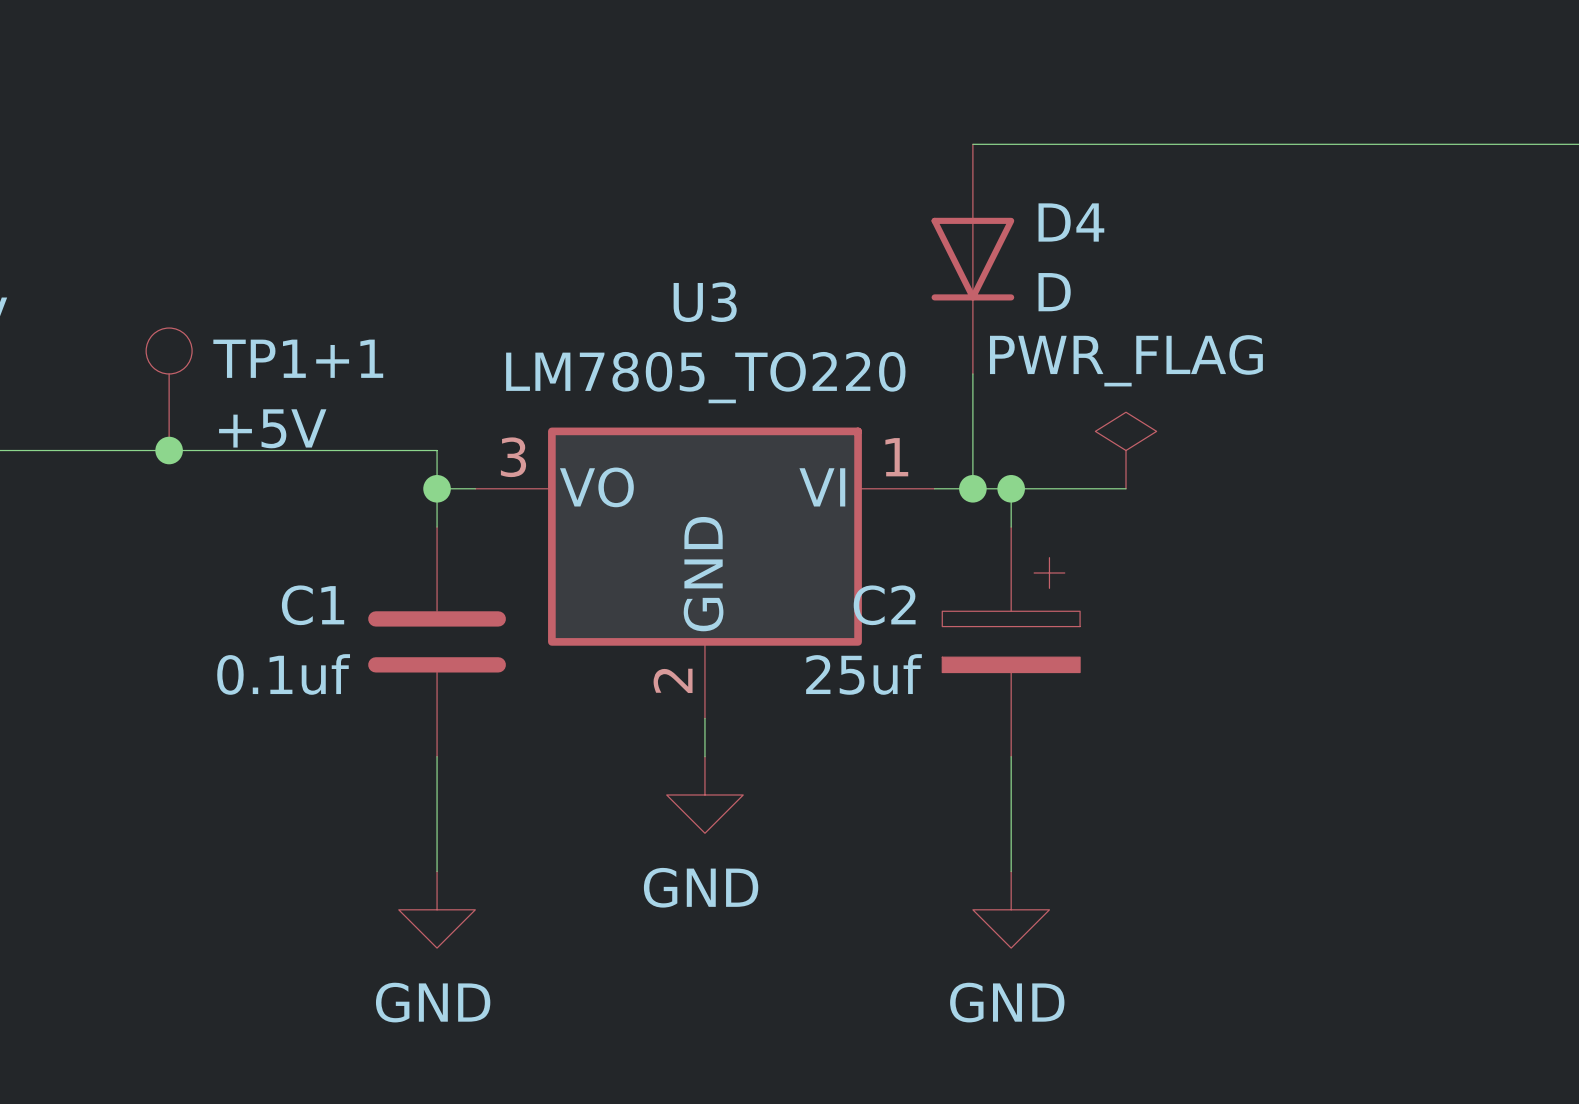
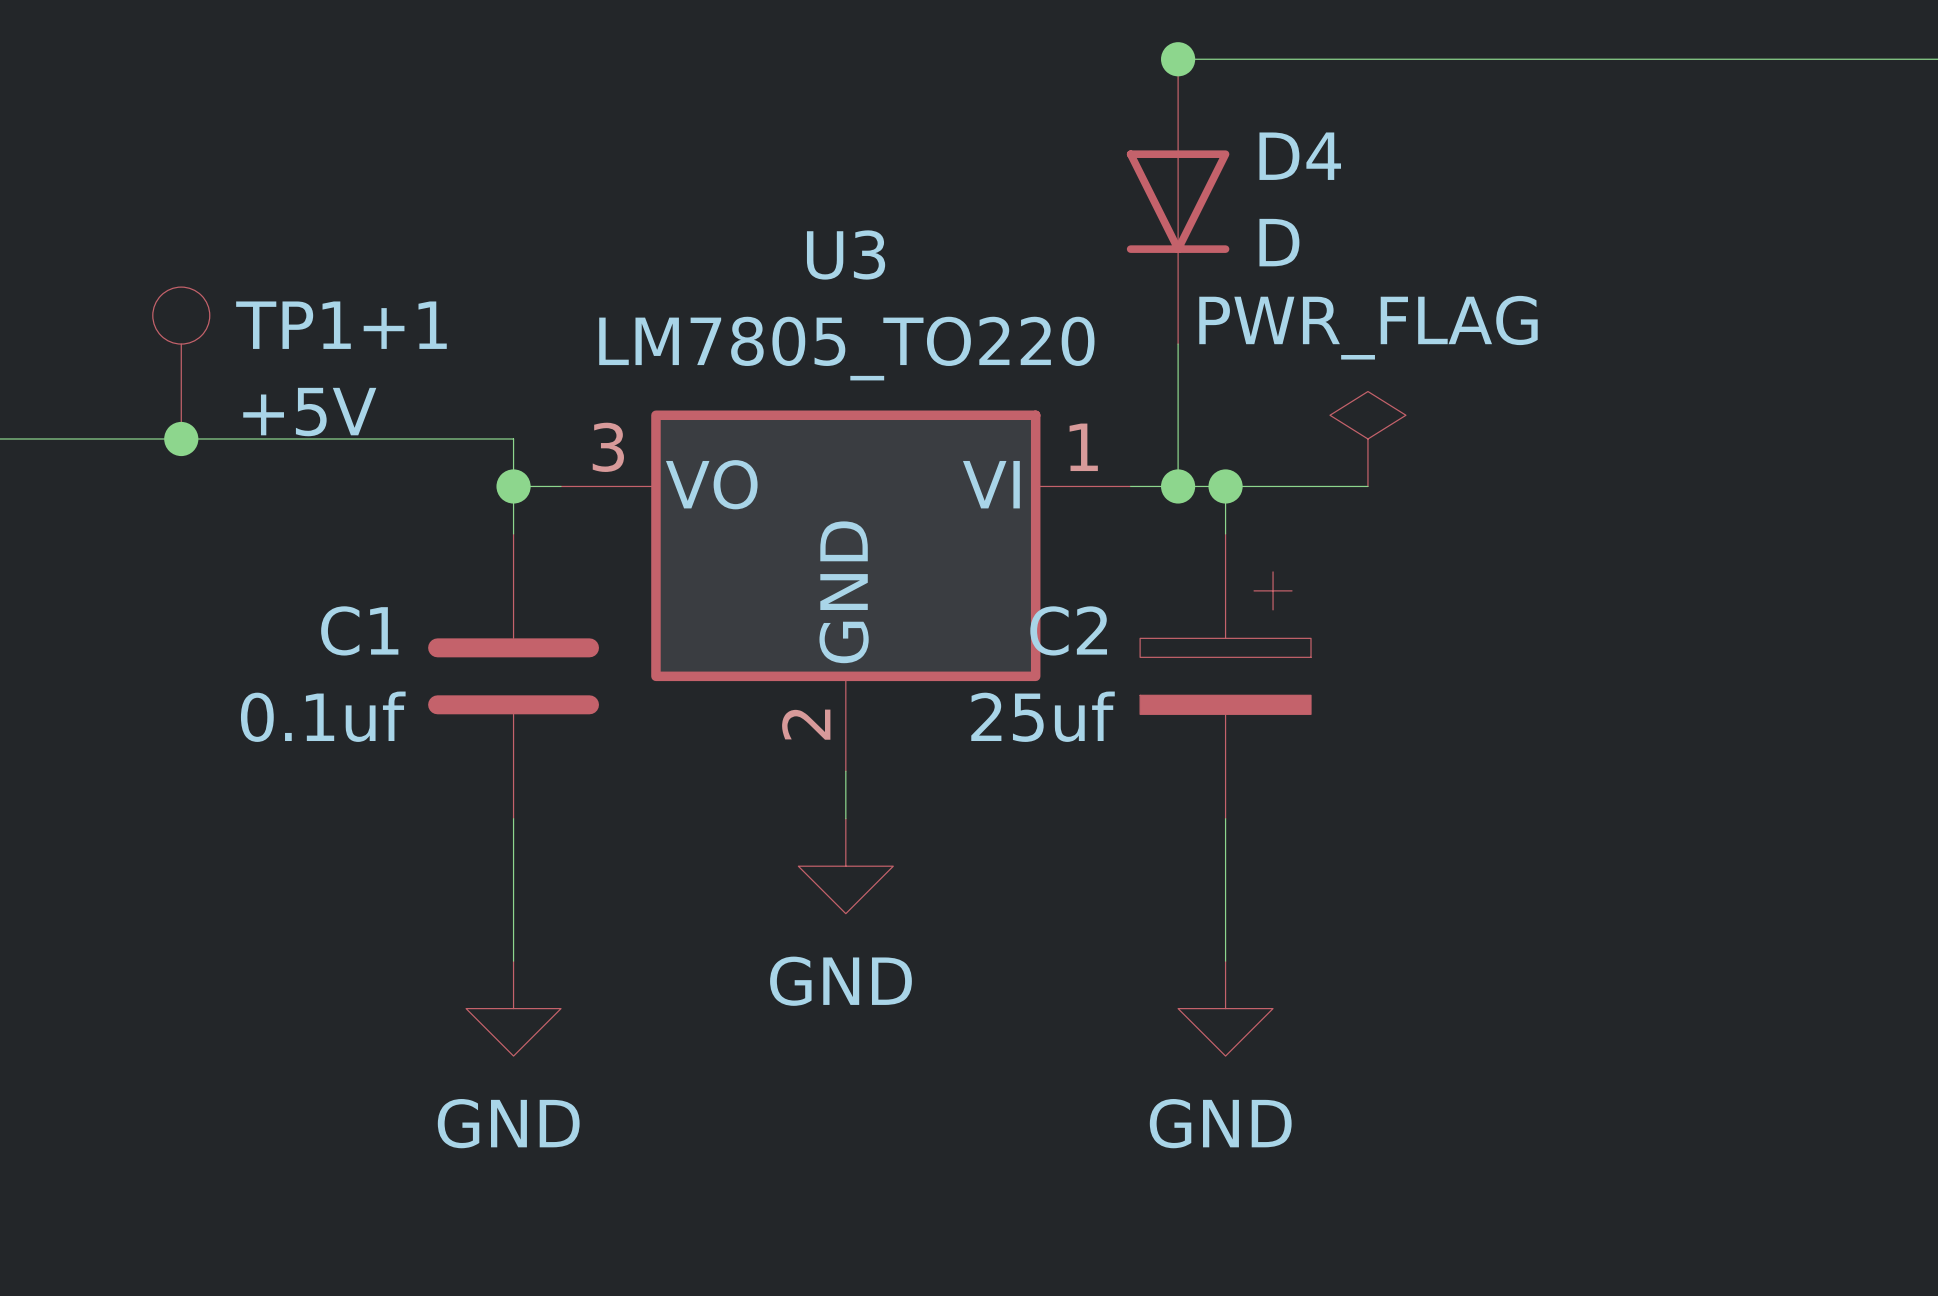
junction: none -> (1178, 59)

